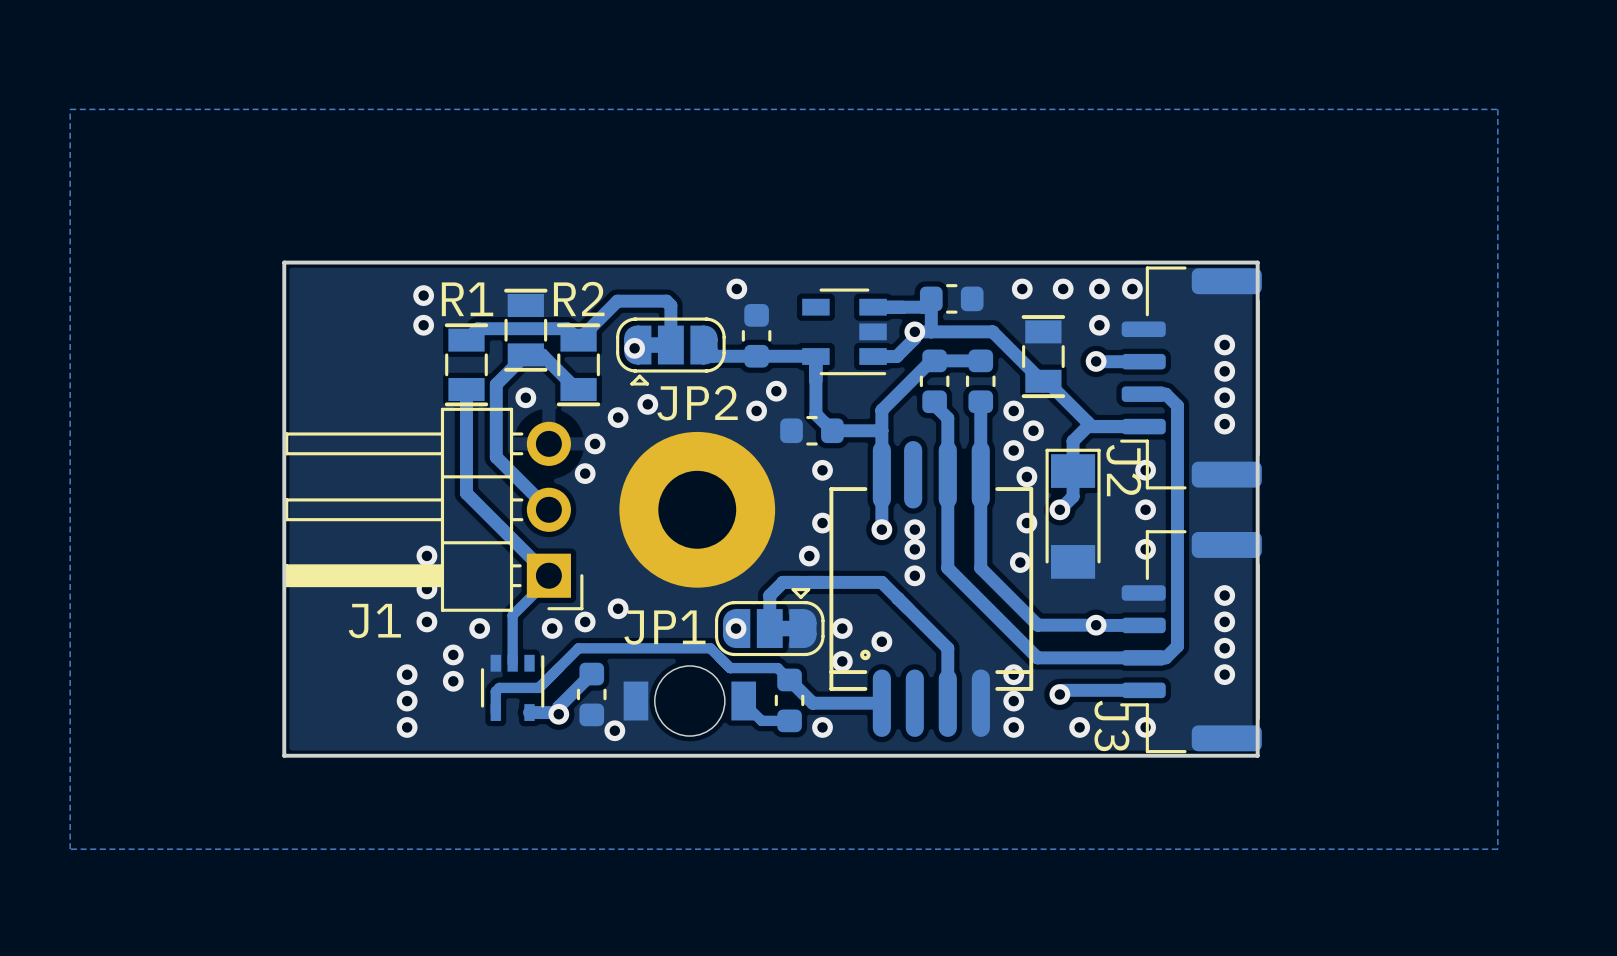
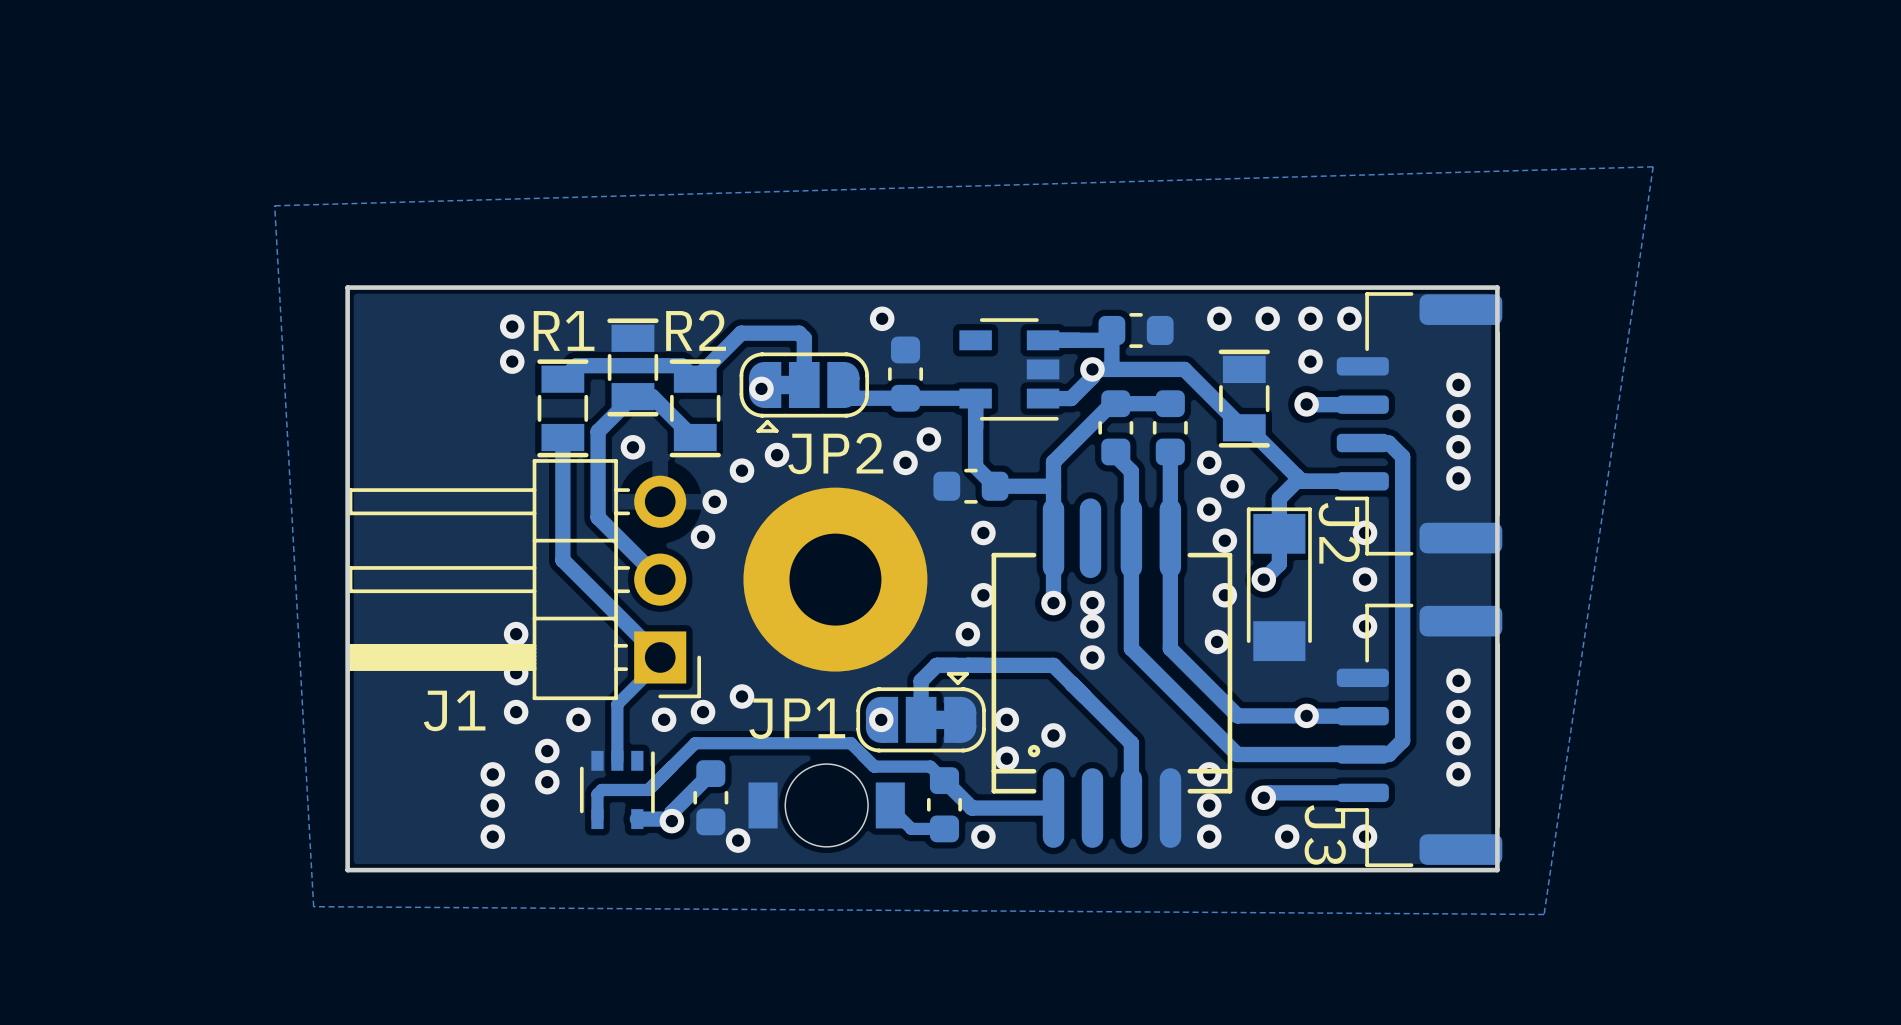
zone outline: (1497, 109) (70, 109) (70, 849) (1497, 849) (1497, 109) -> (1653, 166) (1544, 914) (313, 906) (274, 205) (1653, 166)

